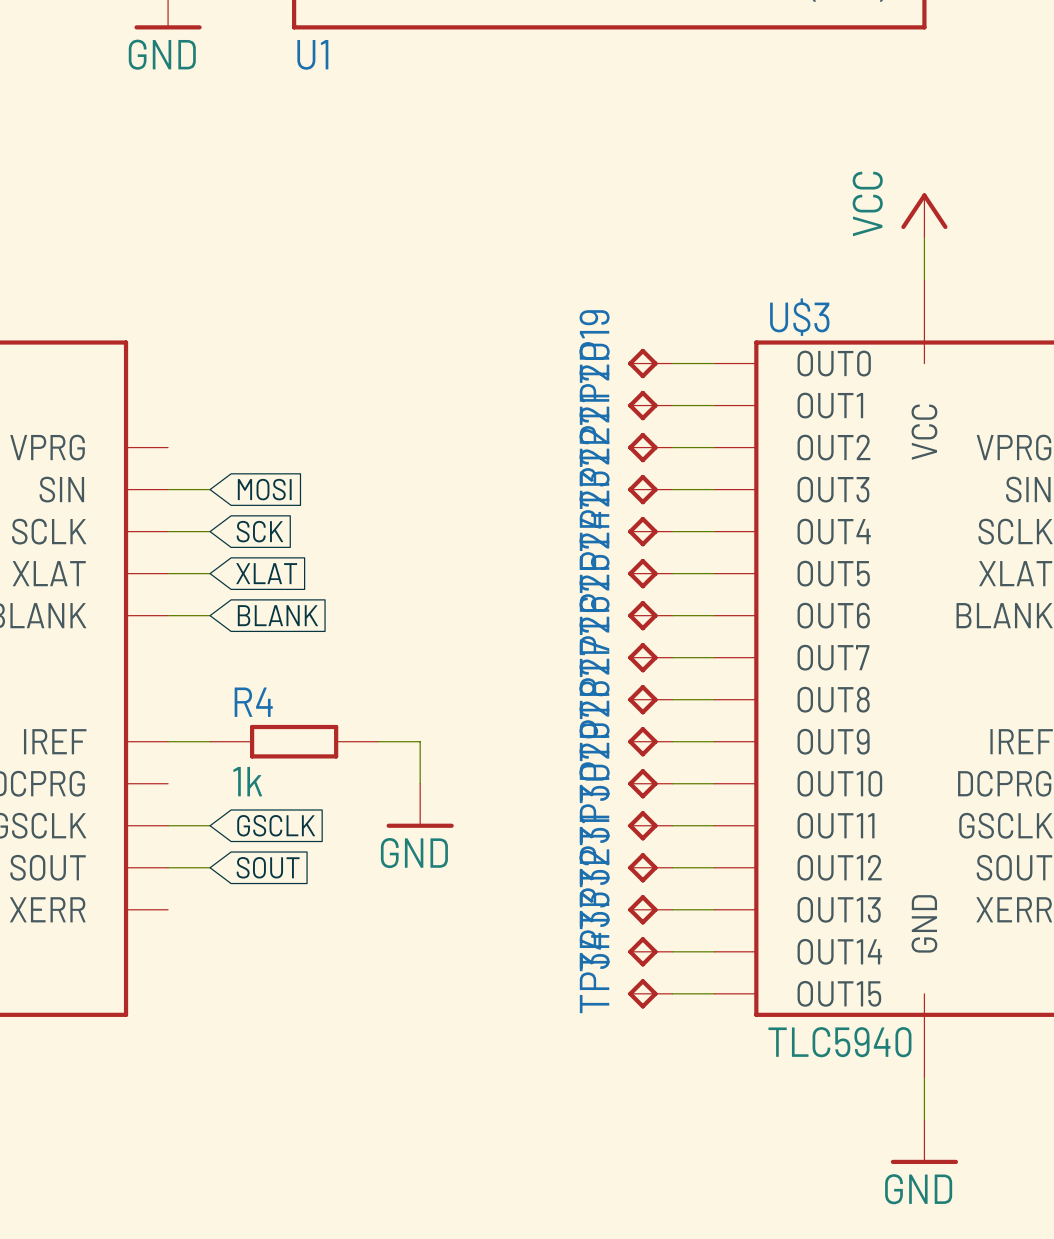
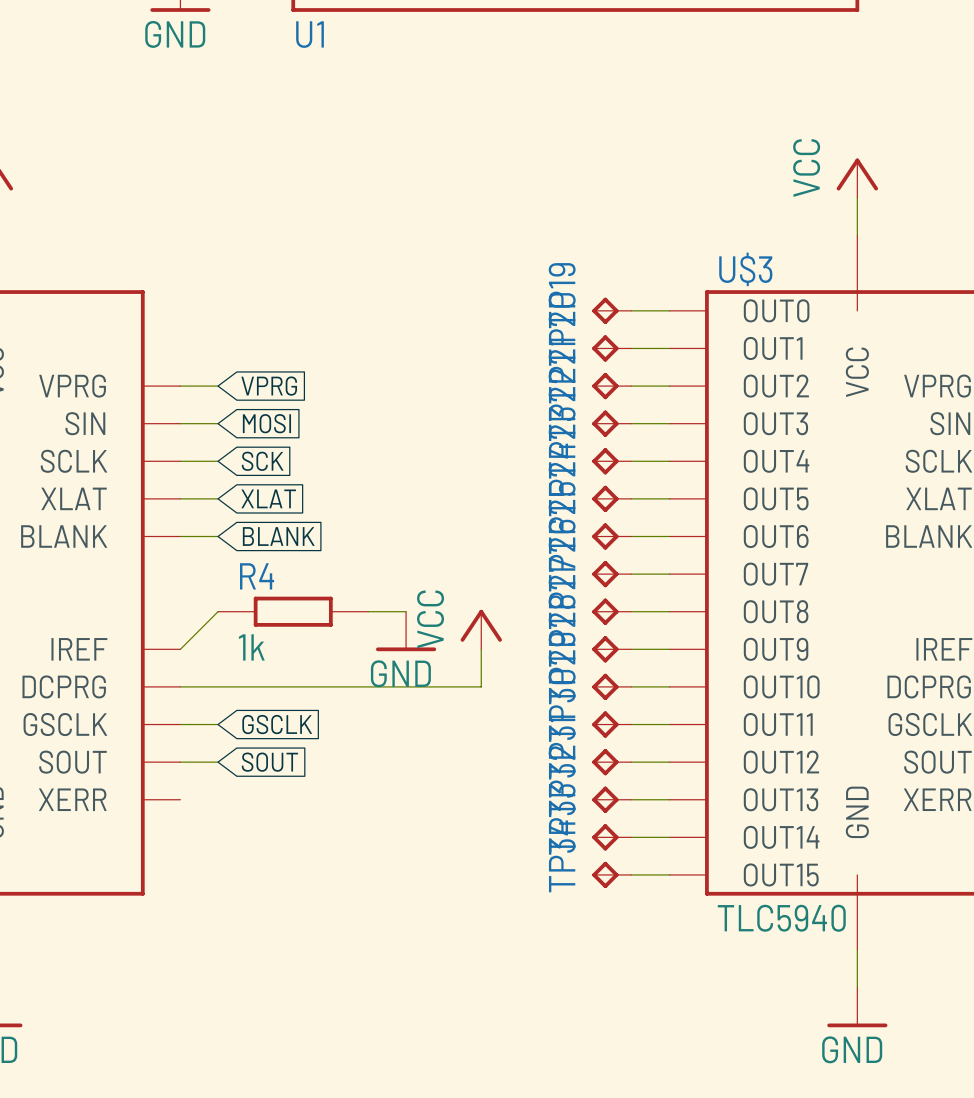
wire: none -> (180, 386) (218, 386)
global label: none -> VPRG (269, 386)
wire: none -> (368, 611) (406, 611)
power symbol: none -> VCC (481, 629)
wire: (168, 741) (210, 741) -> (180, 649) (218, 611)
R4 position: (294, 741) -> (293, 611)
wire: (378, 741) (420, 741) (420, 783) -> none
wire: none -> (481, 649) (481, 686) (180, 686)
power symbol position: GND (420, 805) -> GND (406, 631)

